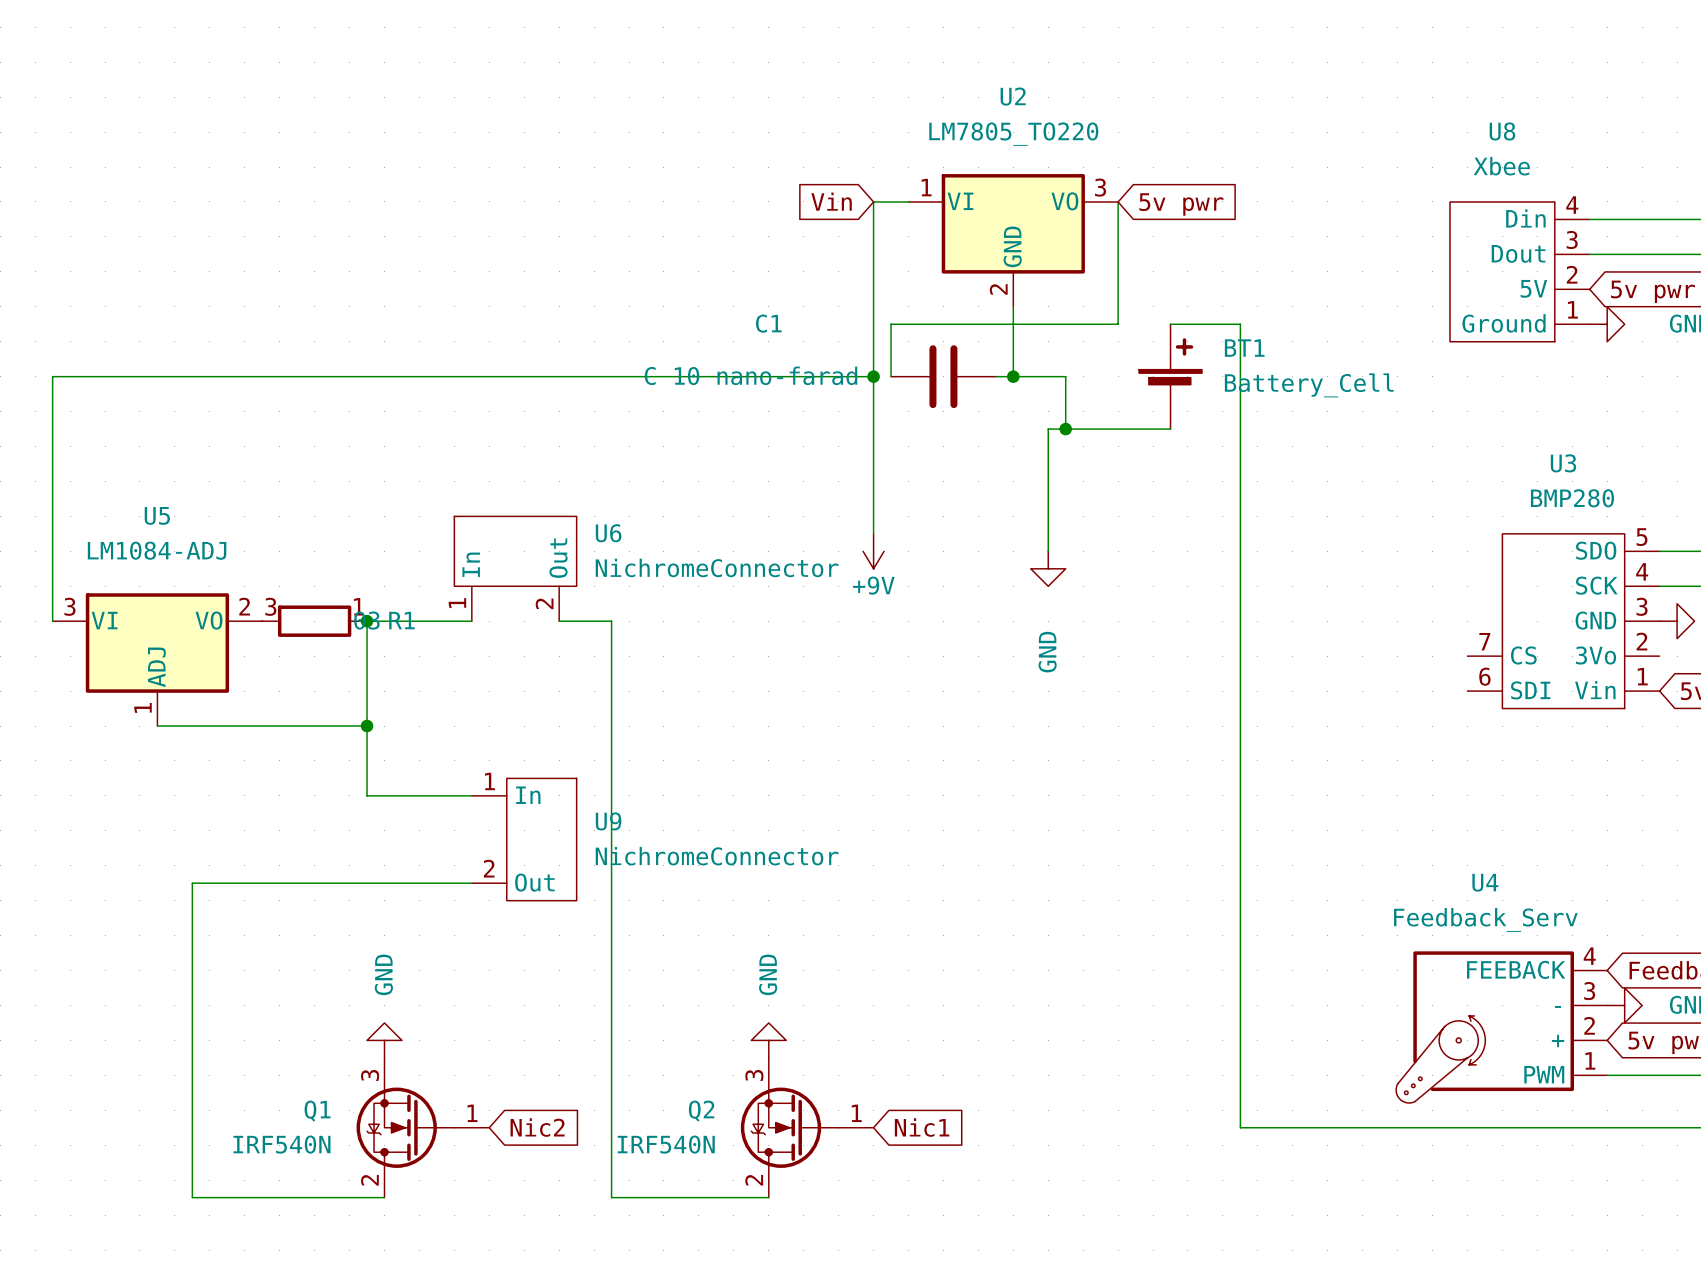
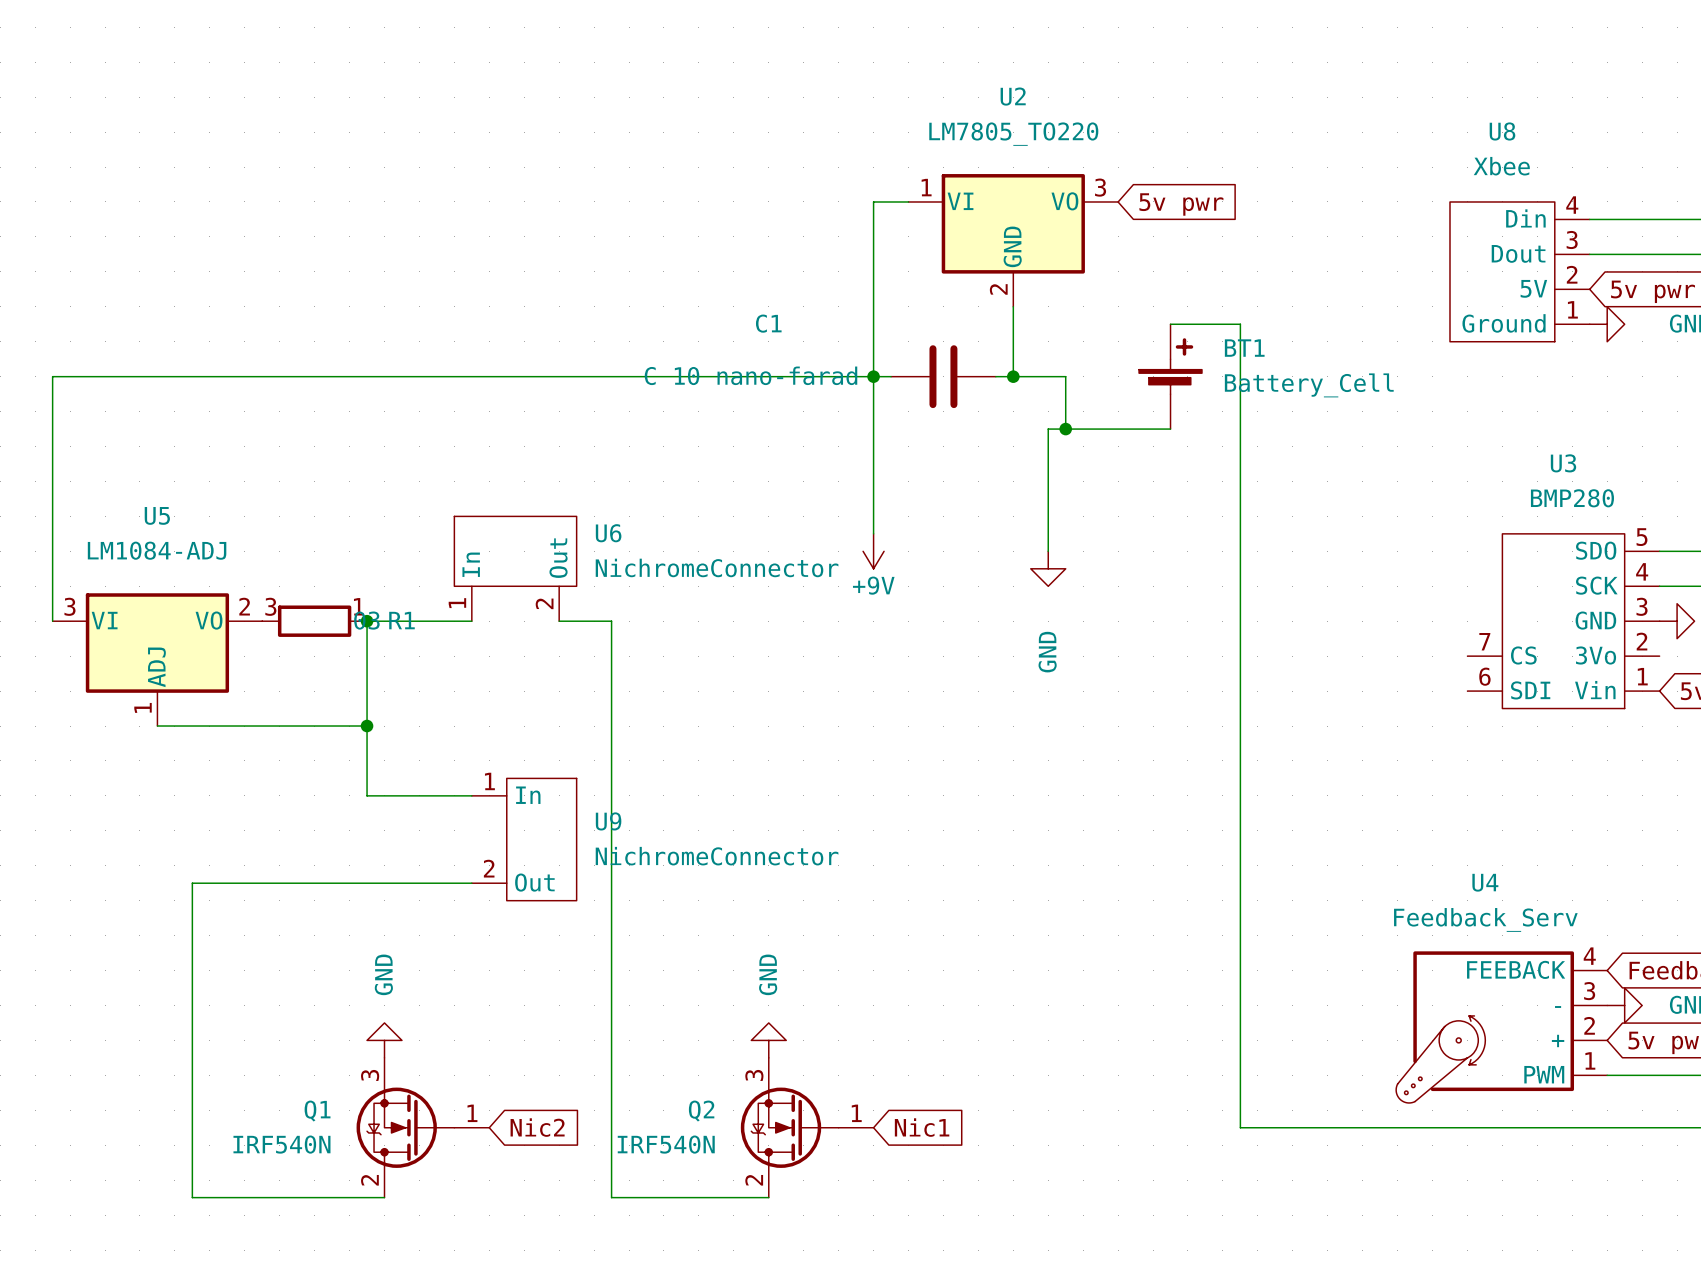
global label: Vin (831, 201) -> none
wire: (1118, 201) (1118, 324) (891, 324) (891, 376) -> (873, 376) (891, 376)

